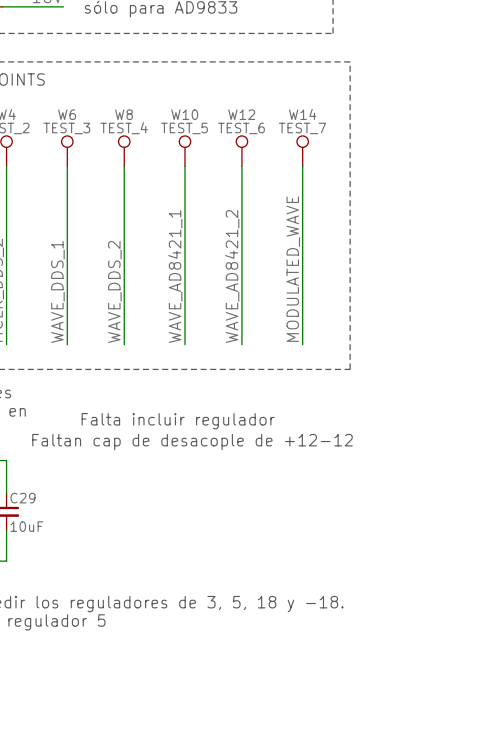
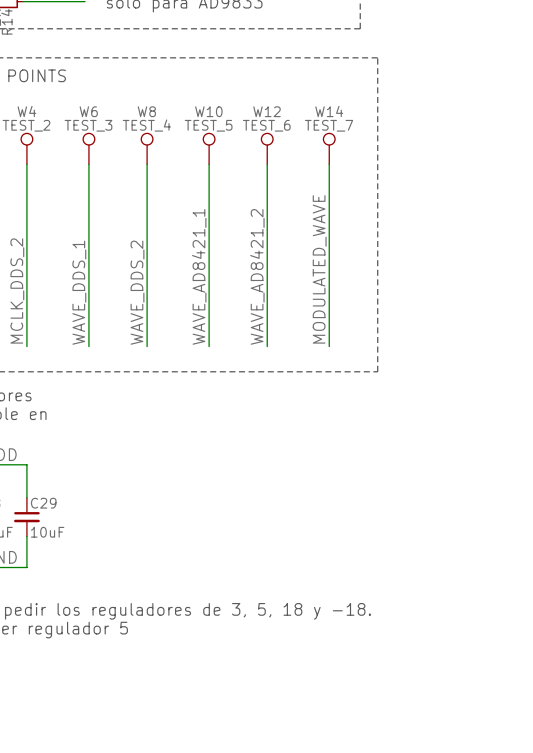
text: Falta incluir regulador (178, 421) -> none
text: Faltan cap de desacople de +12-12 (192, 442) -> none

